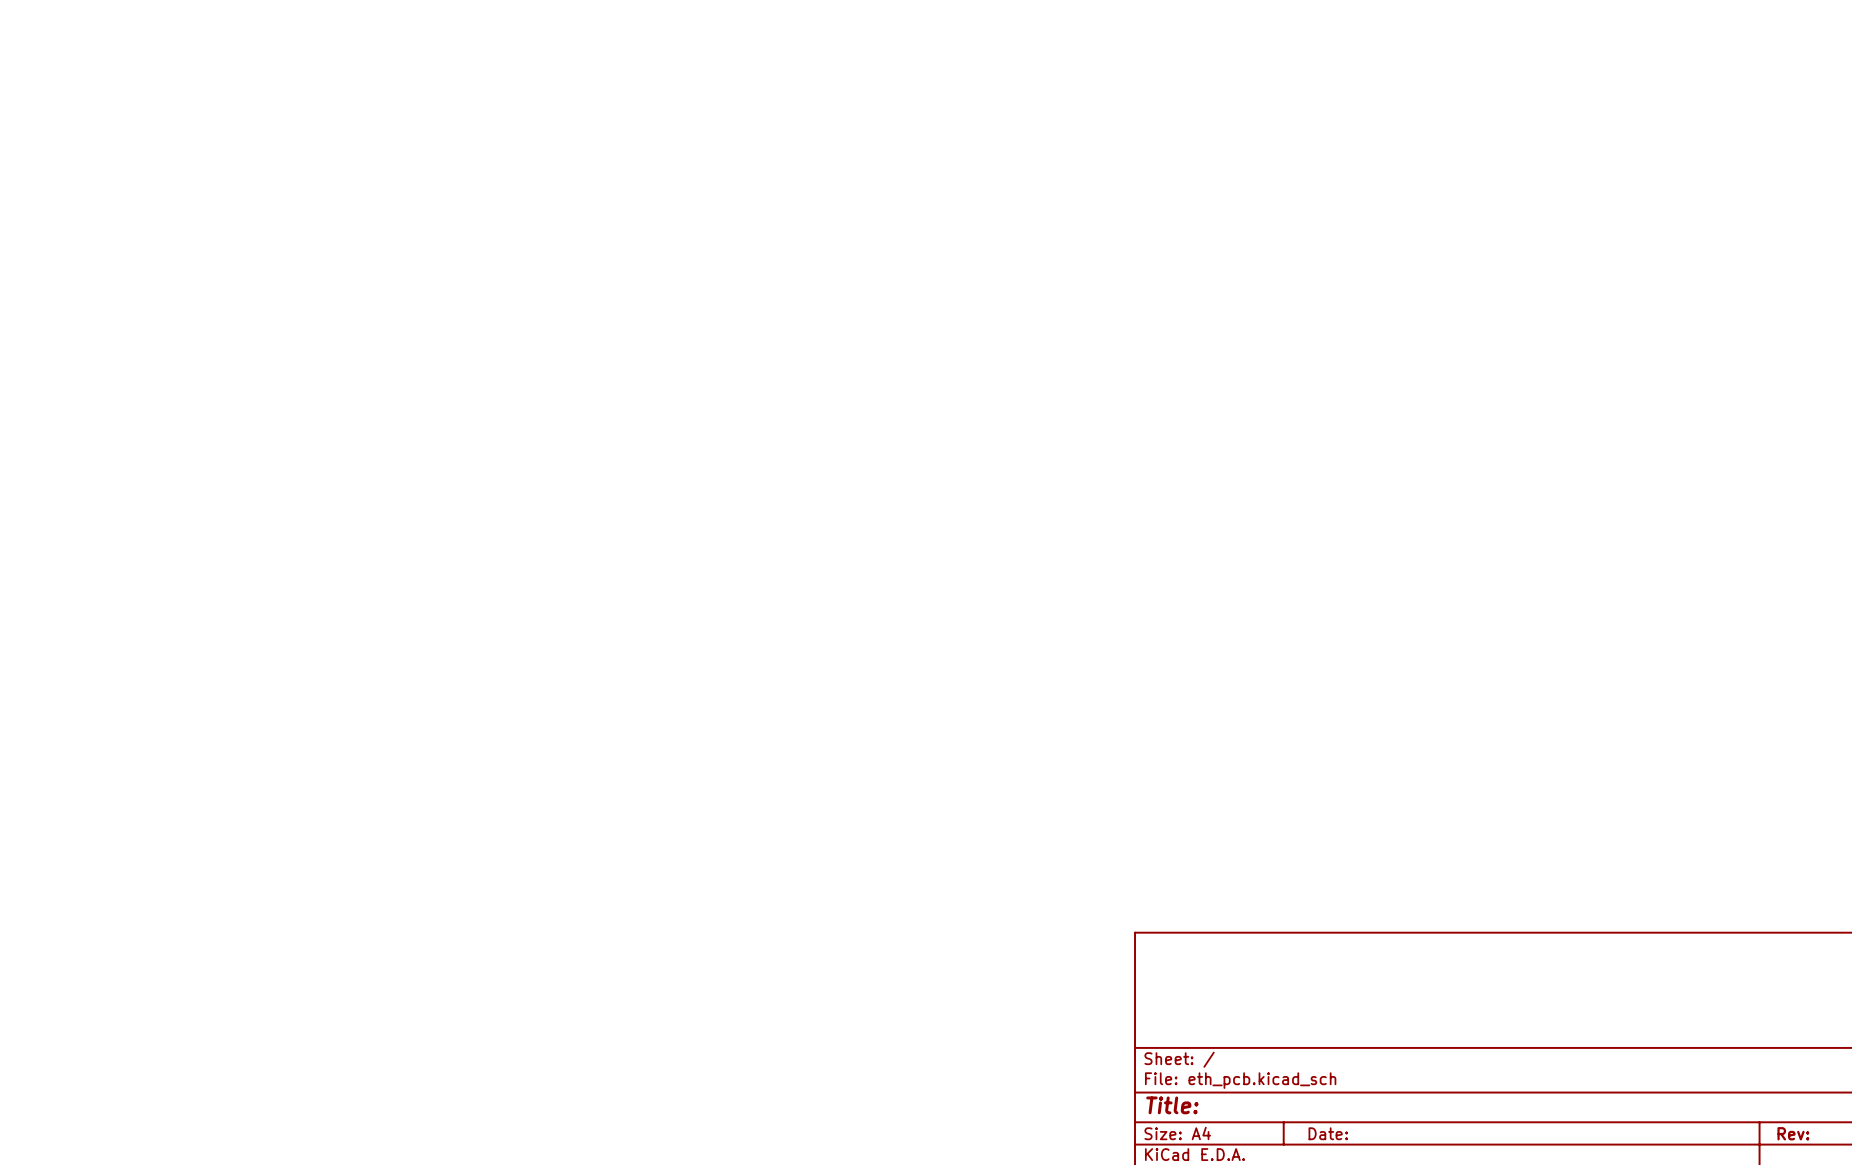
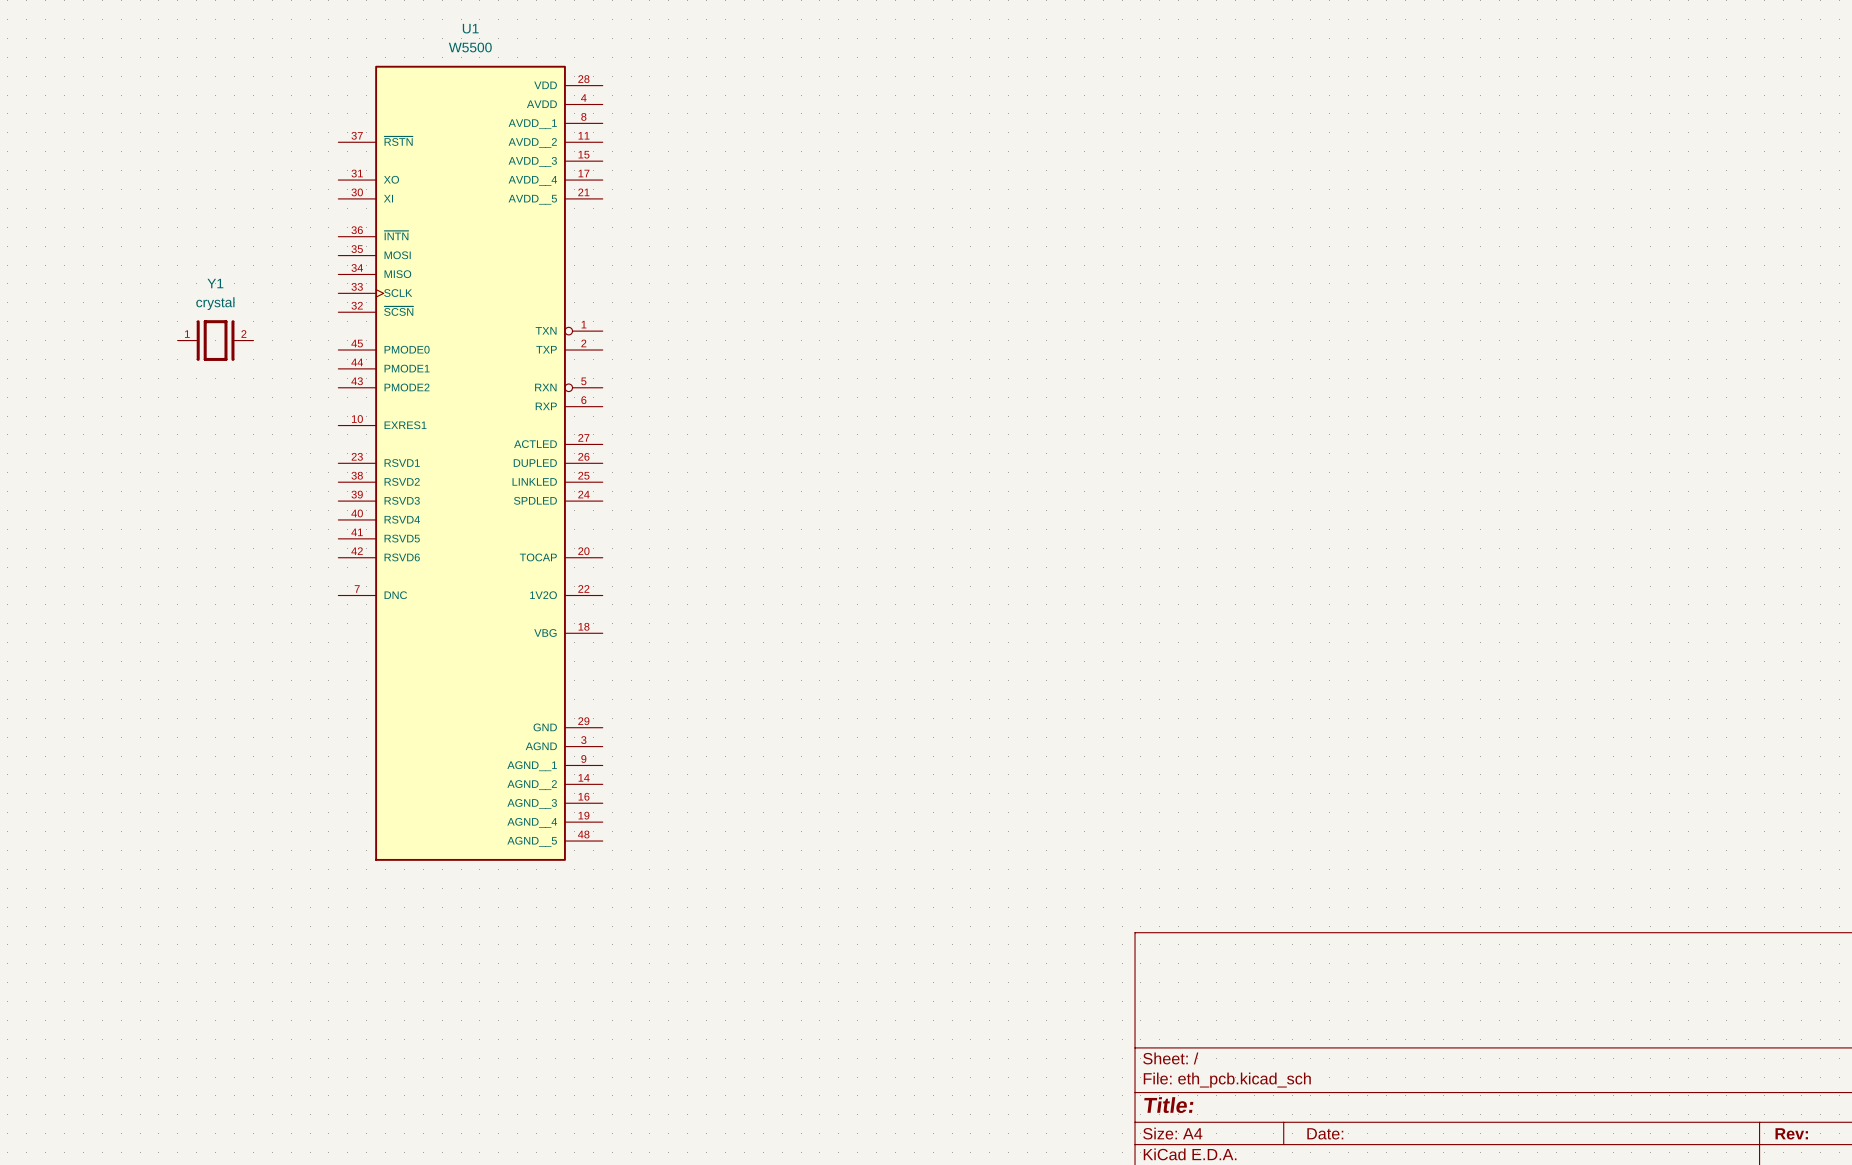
Y1: none -> crystal (215, 340)
U1: none -> W5500 (470, 463)

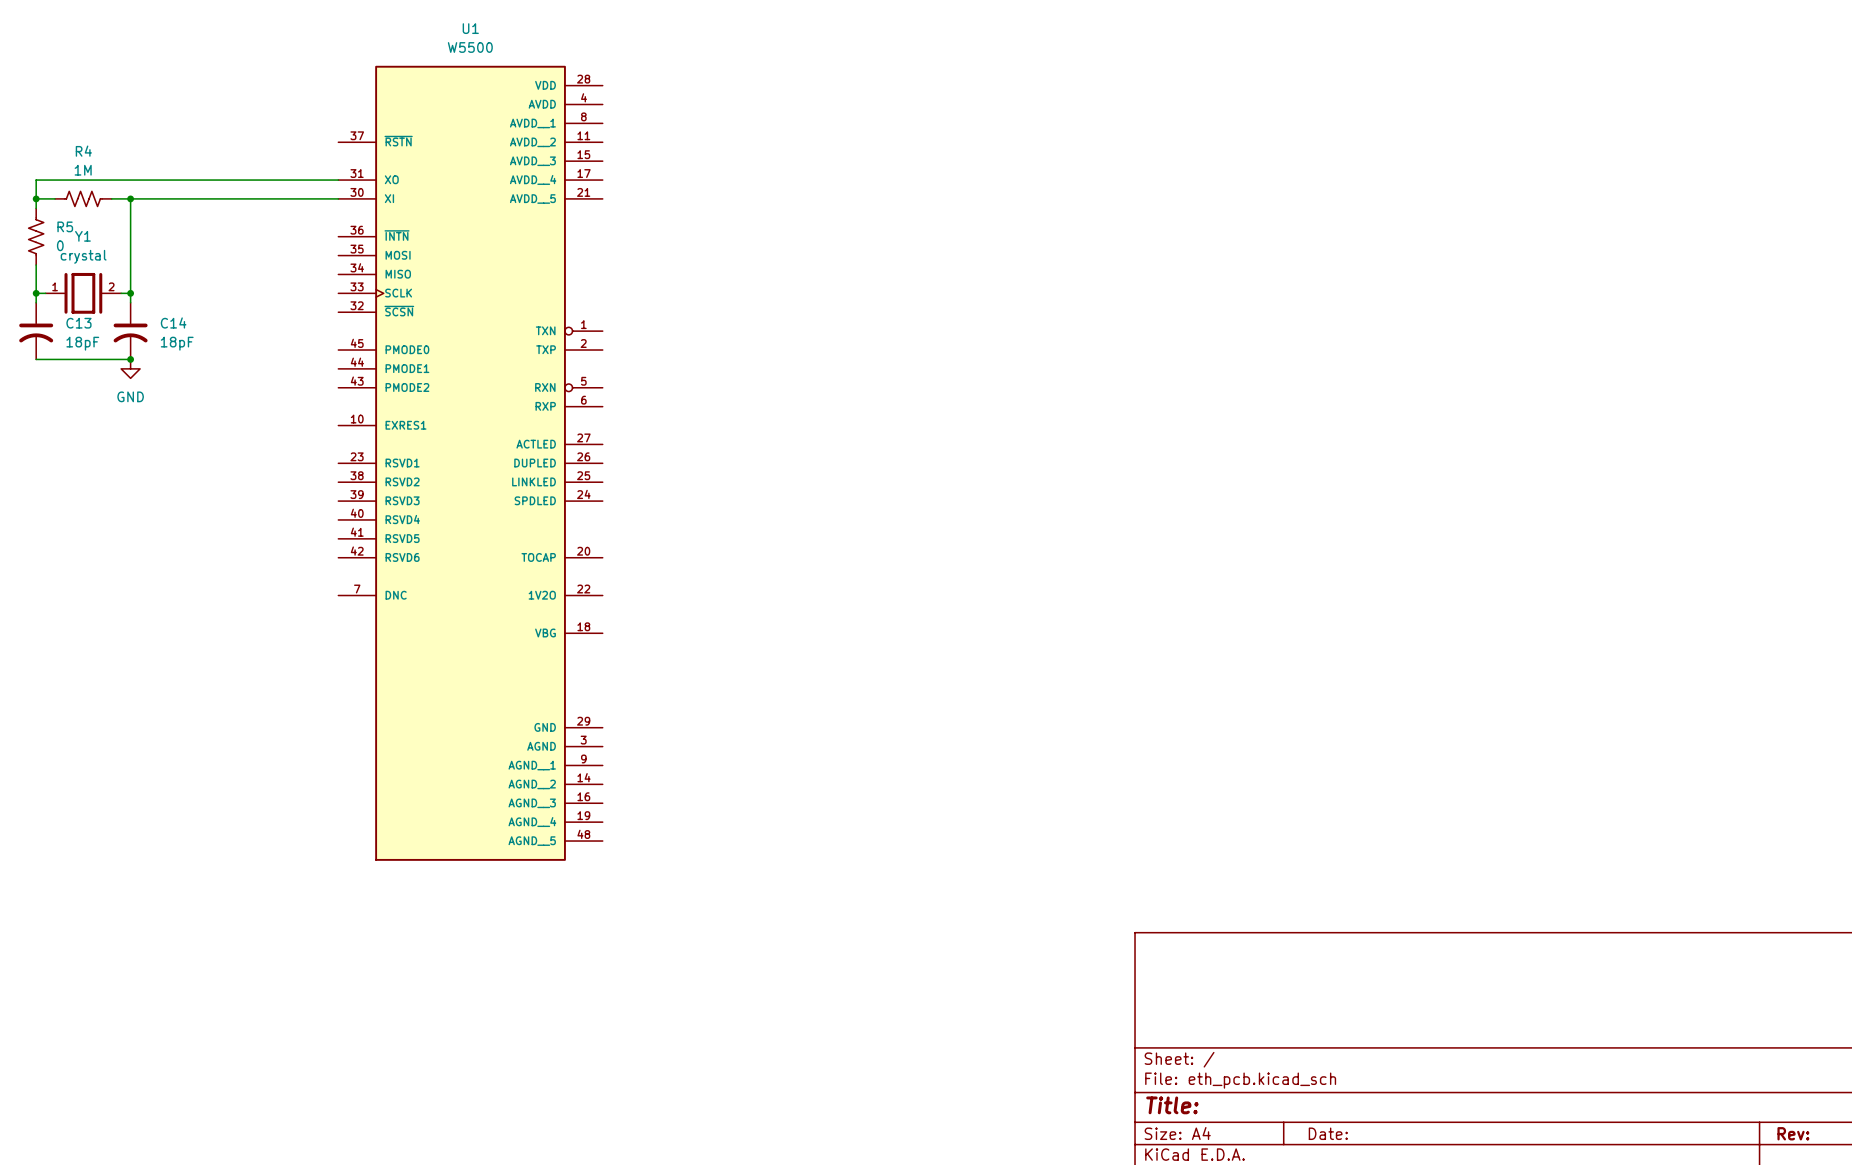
wire: none -> (338, 180) (36, 180) (36, 208)
wire: none -> (36, 198) (55, 198)
junction: none -> (36, 198)
R4: none -> 1M (83, 198)
wire: none -> (111, 198) (338, 198)
wire: none -> (130, 198) (130, 302)
junction: none -> (130, 198)
R5: none -> 0 (36, 236)
wire: none -> (36, 265) (36, 302)
wire: none -> (36, 293) (45, 293)
junction: none -> (36, 293)
wire: none -> (121, 293) (130, 293)
junction: none -> (130, 293)
C13: none -> 18pF (36, 331)
C14: none -> 18pF (130, 331)
Y1 position: (215, 340) -> (83, 293)
wire: none -> (36, 359) (130, 359)
junction: none -> (130, 359)
power symbol: none -> GND (130, 368)

